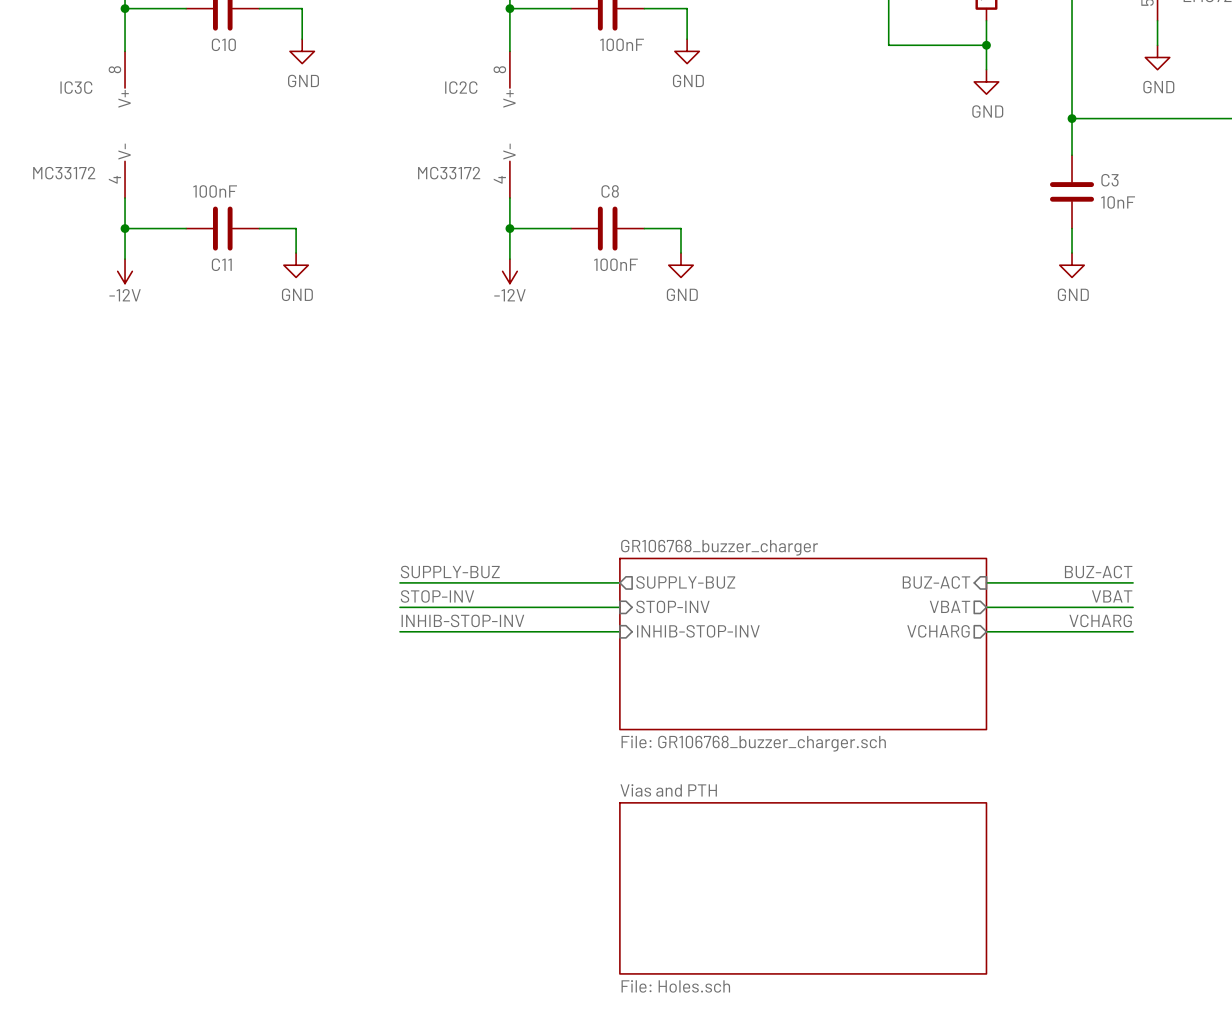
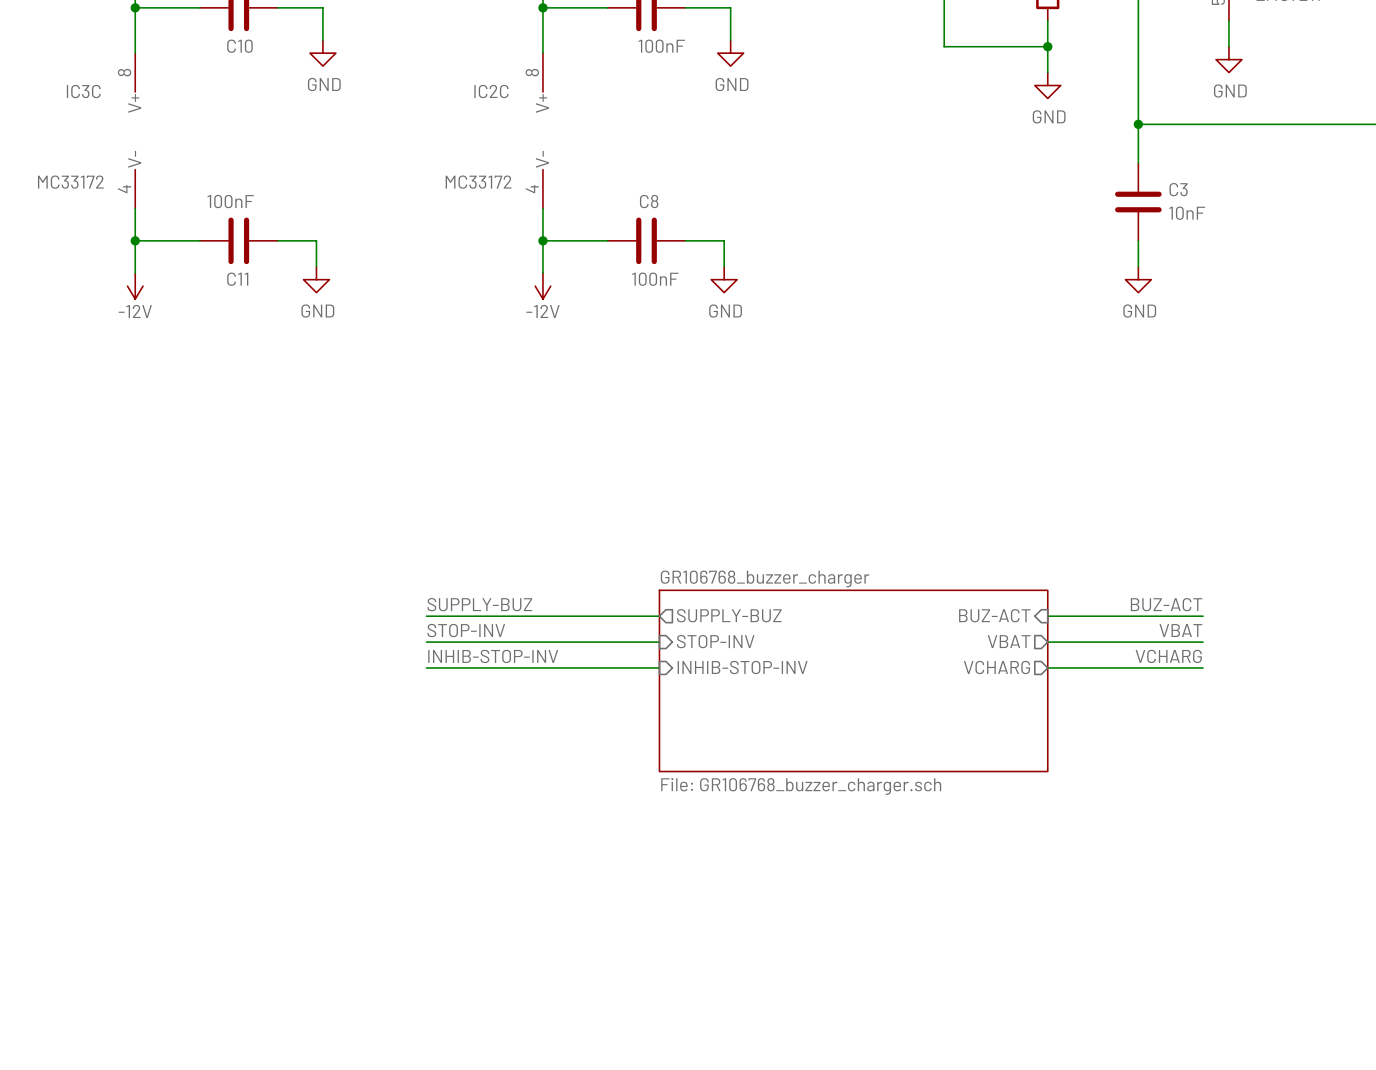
sheet Vias and PTH: File: Holes.sch (803, 888) -> none

